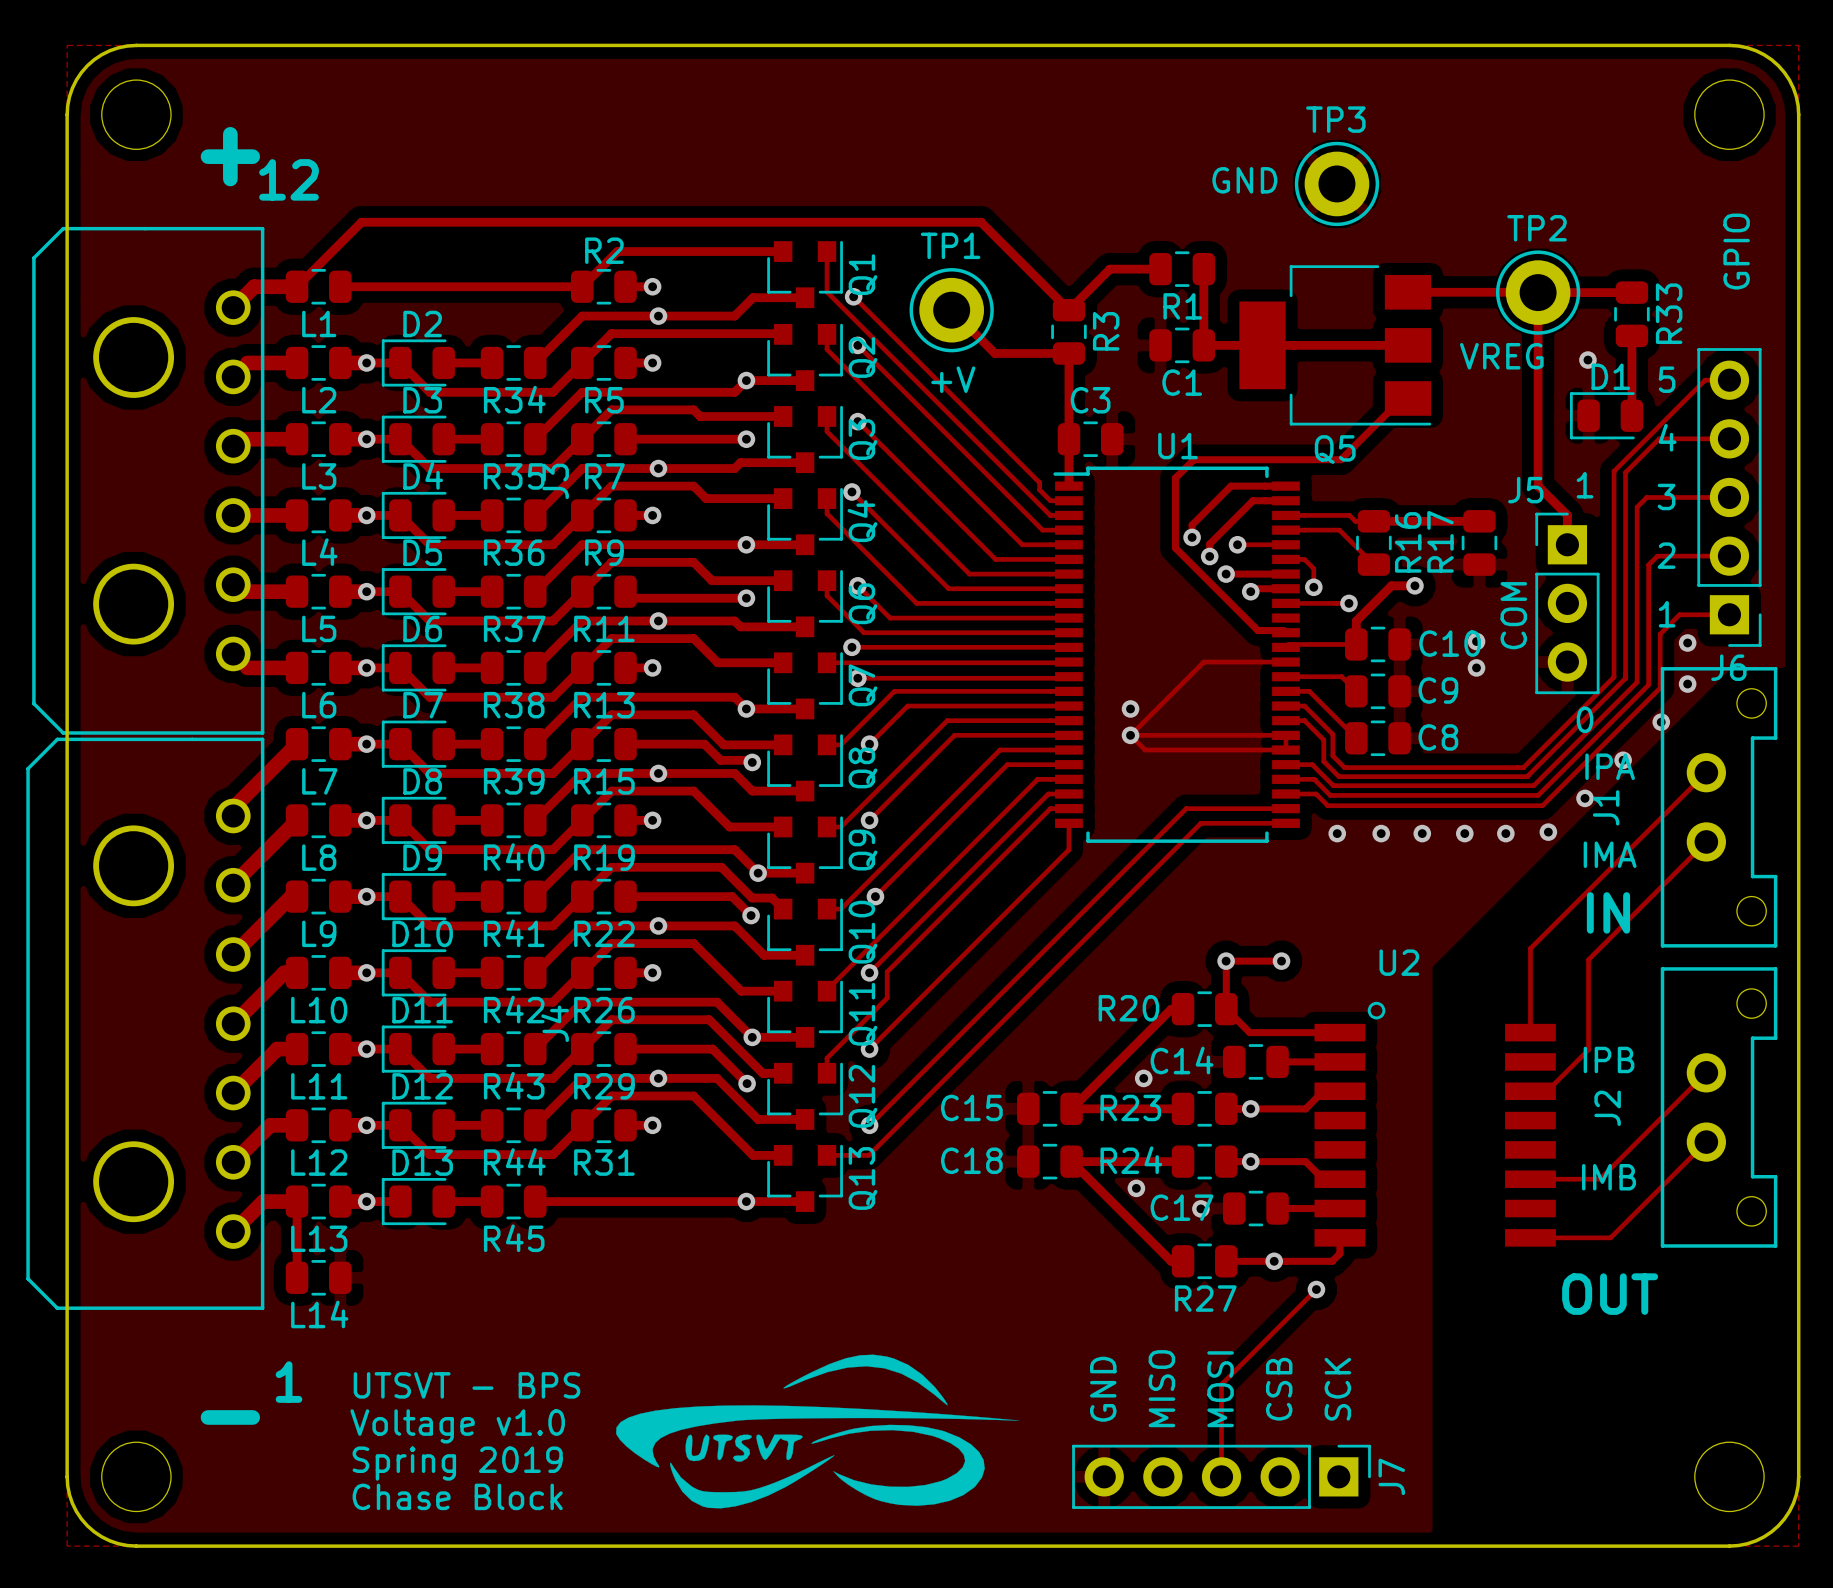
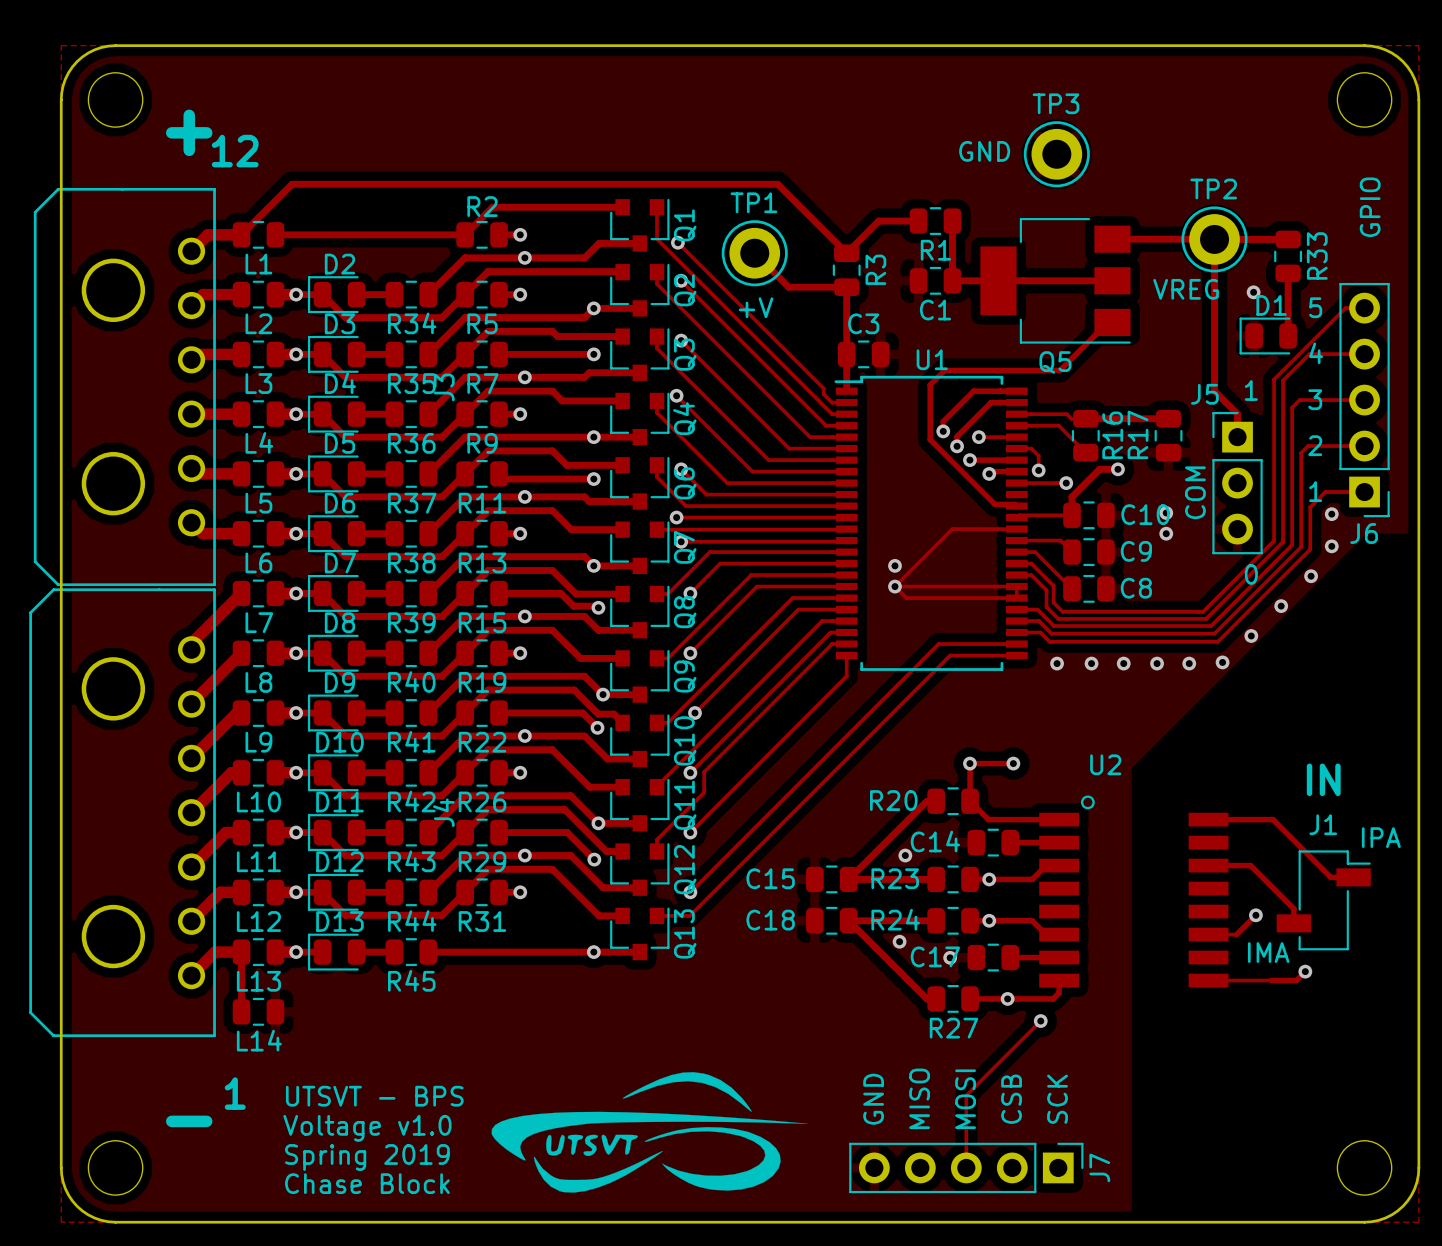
J1 footprint: [1660, 667, 1778, 948] -> [1276, 850, 1371, 951]
text position: IPA (1610, 766) -> IPA (1381, 837)
track: (1706, 772) (1530, 948) (1530, 1032) -> (1353, 877) (1330, 877) (1273, 819) (1208, 819)
J1 name position: J1 (1606, 807) -> J1 (1323, 824)
track: (1706, 841) (1588, 959) (1588, 1049) (1547, 1091) -> (1293, 923) (1293, 908) (1250, 865) (1221, 865)
text position: IMA (1610, 854) -> IMA (1268, 952)
text position: IN (1608, 912) -> IN (1323, 779)
text: IPB (1609, 1059) -> none
track: (1706, 1072) (1599, 1179) (1566, 1179) -> (1255, 915) (1236, 934)
J2: (1719, 1107) -> none
track: (1706, 1142) (1610, 1237) -> (1305, 971) (1296, 980) (1271, 980)
via: none -> (1255, 915)
text: IMB (1609, 1177) -> none
via: none -> (1305, 971)
text: OUT (1610, 1294) -> none

